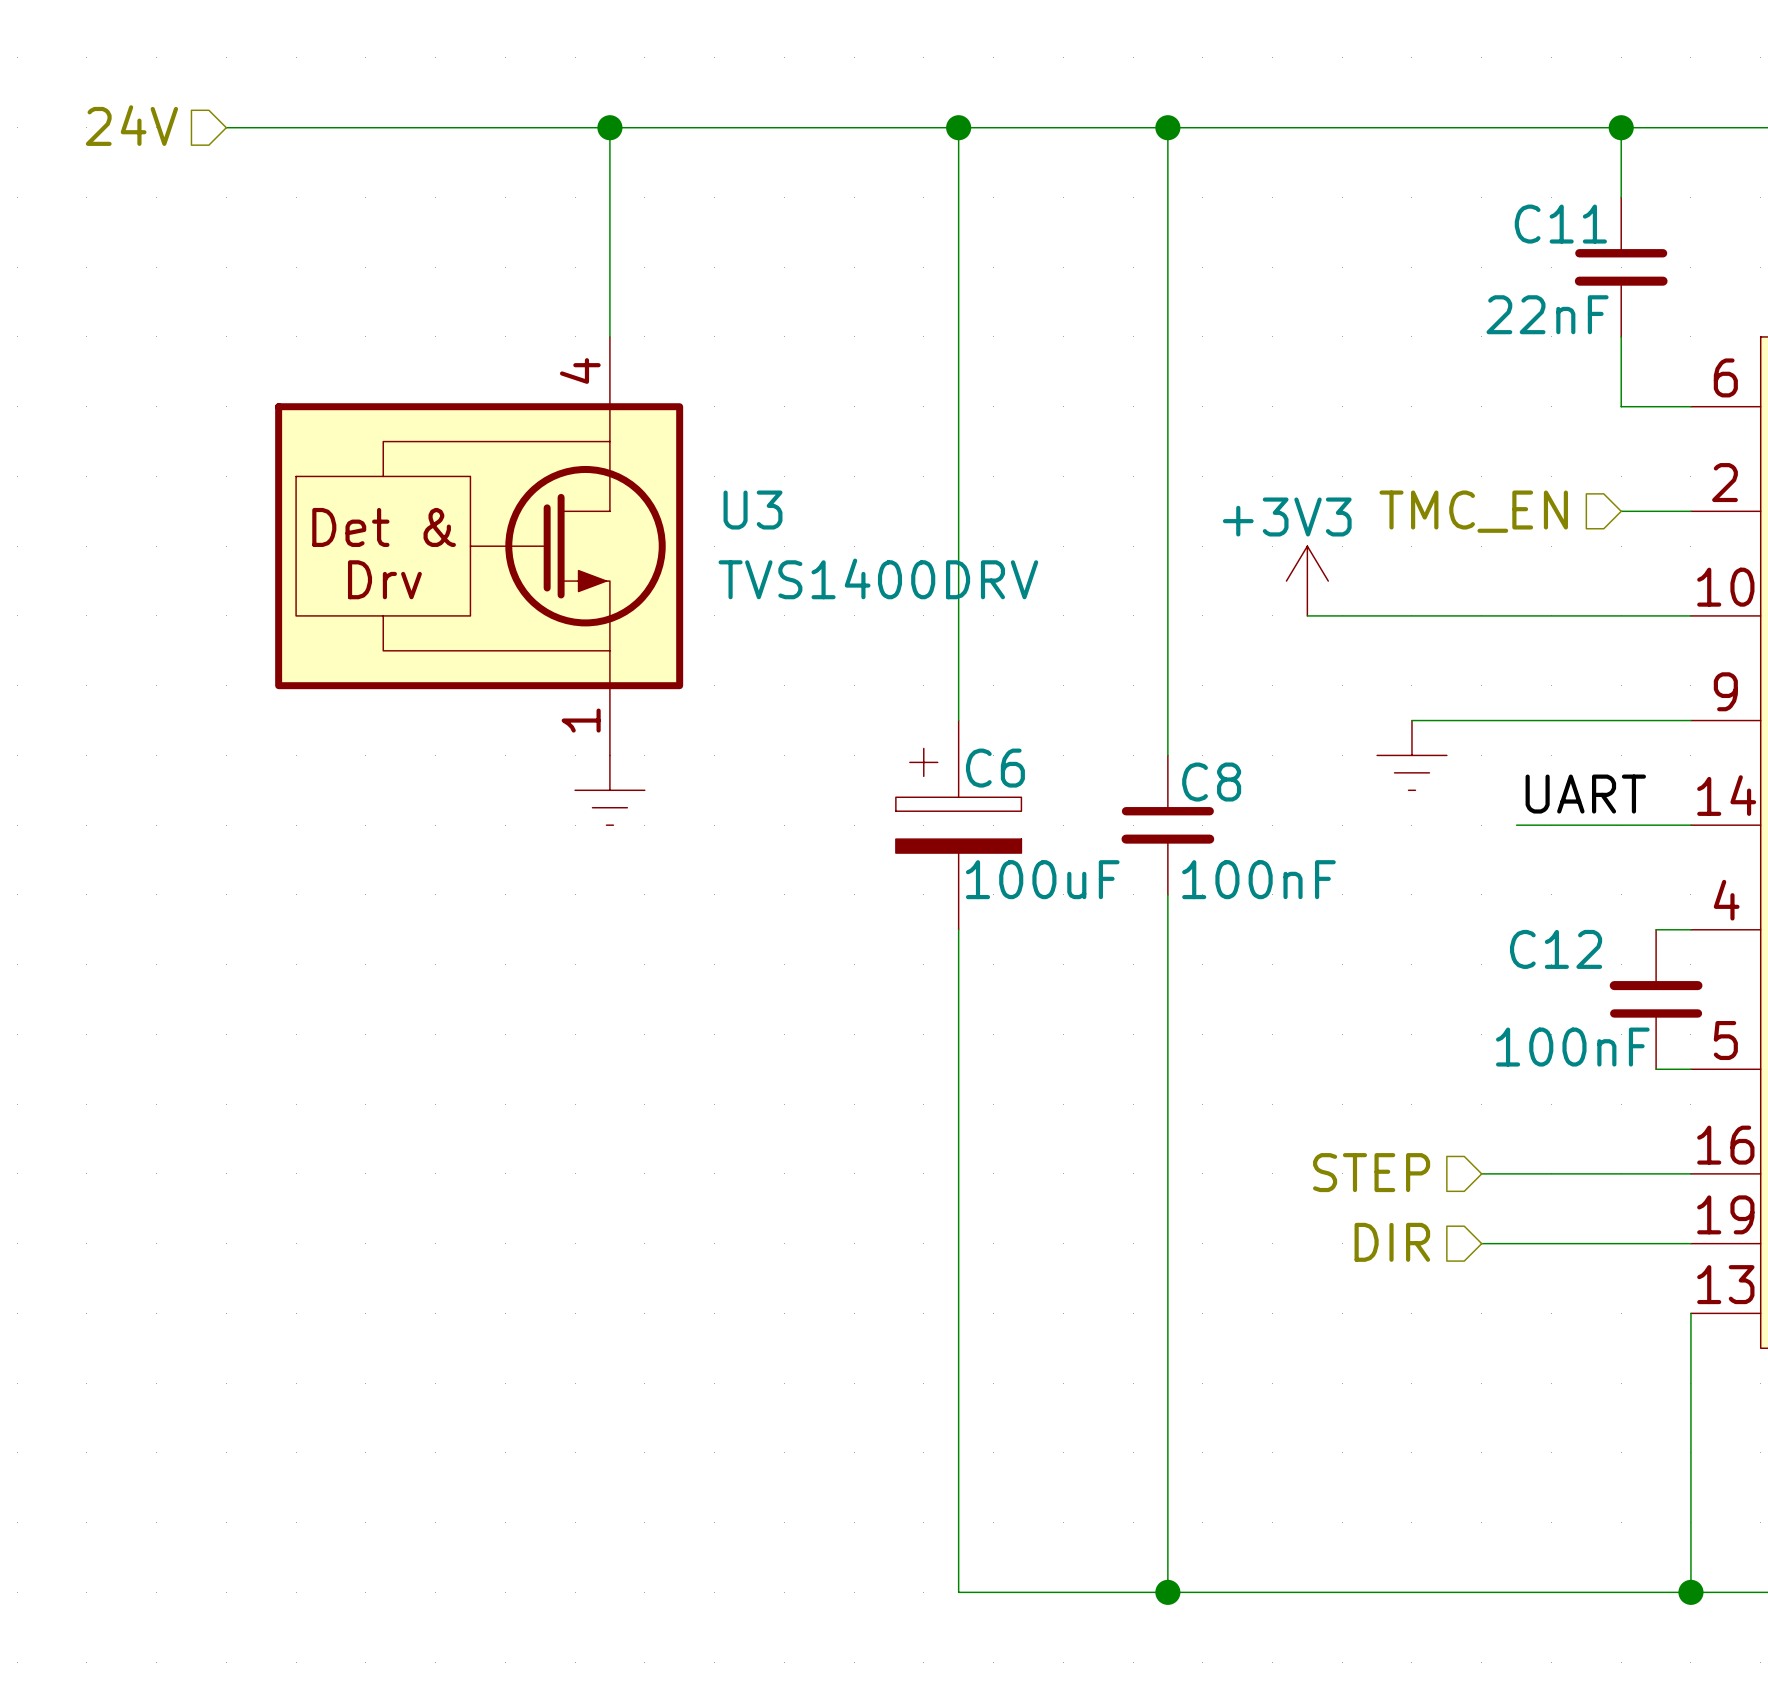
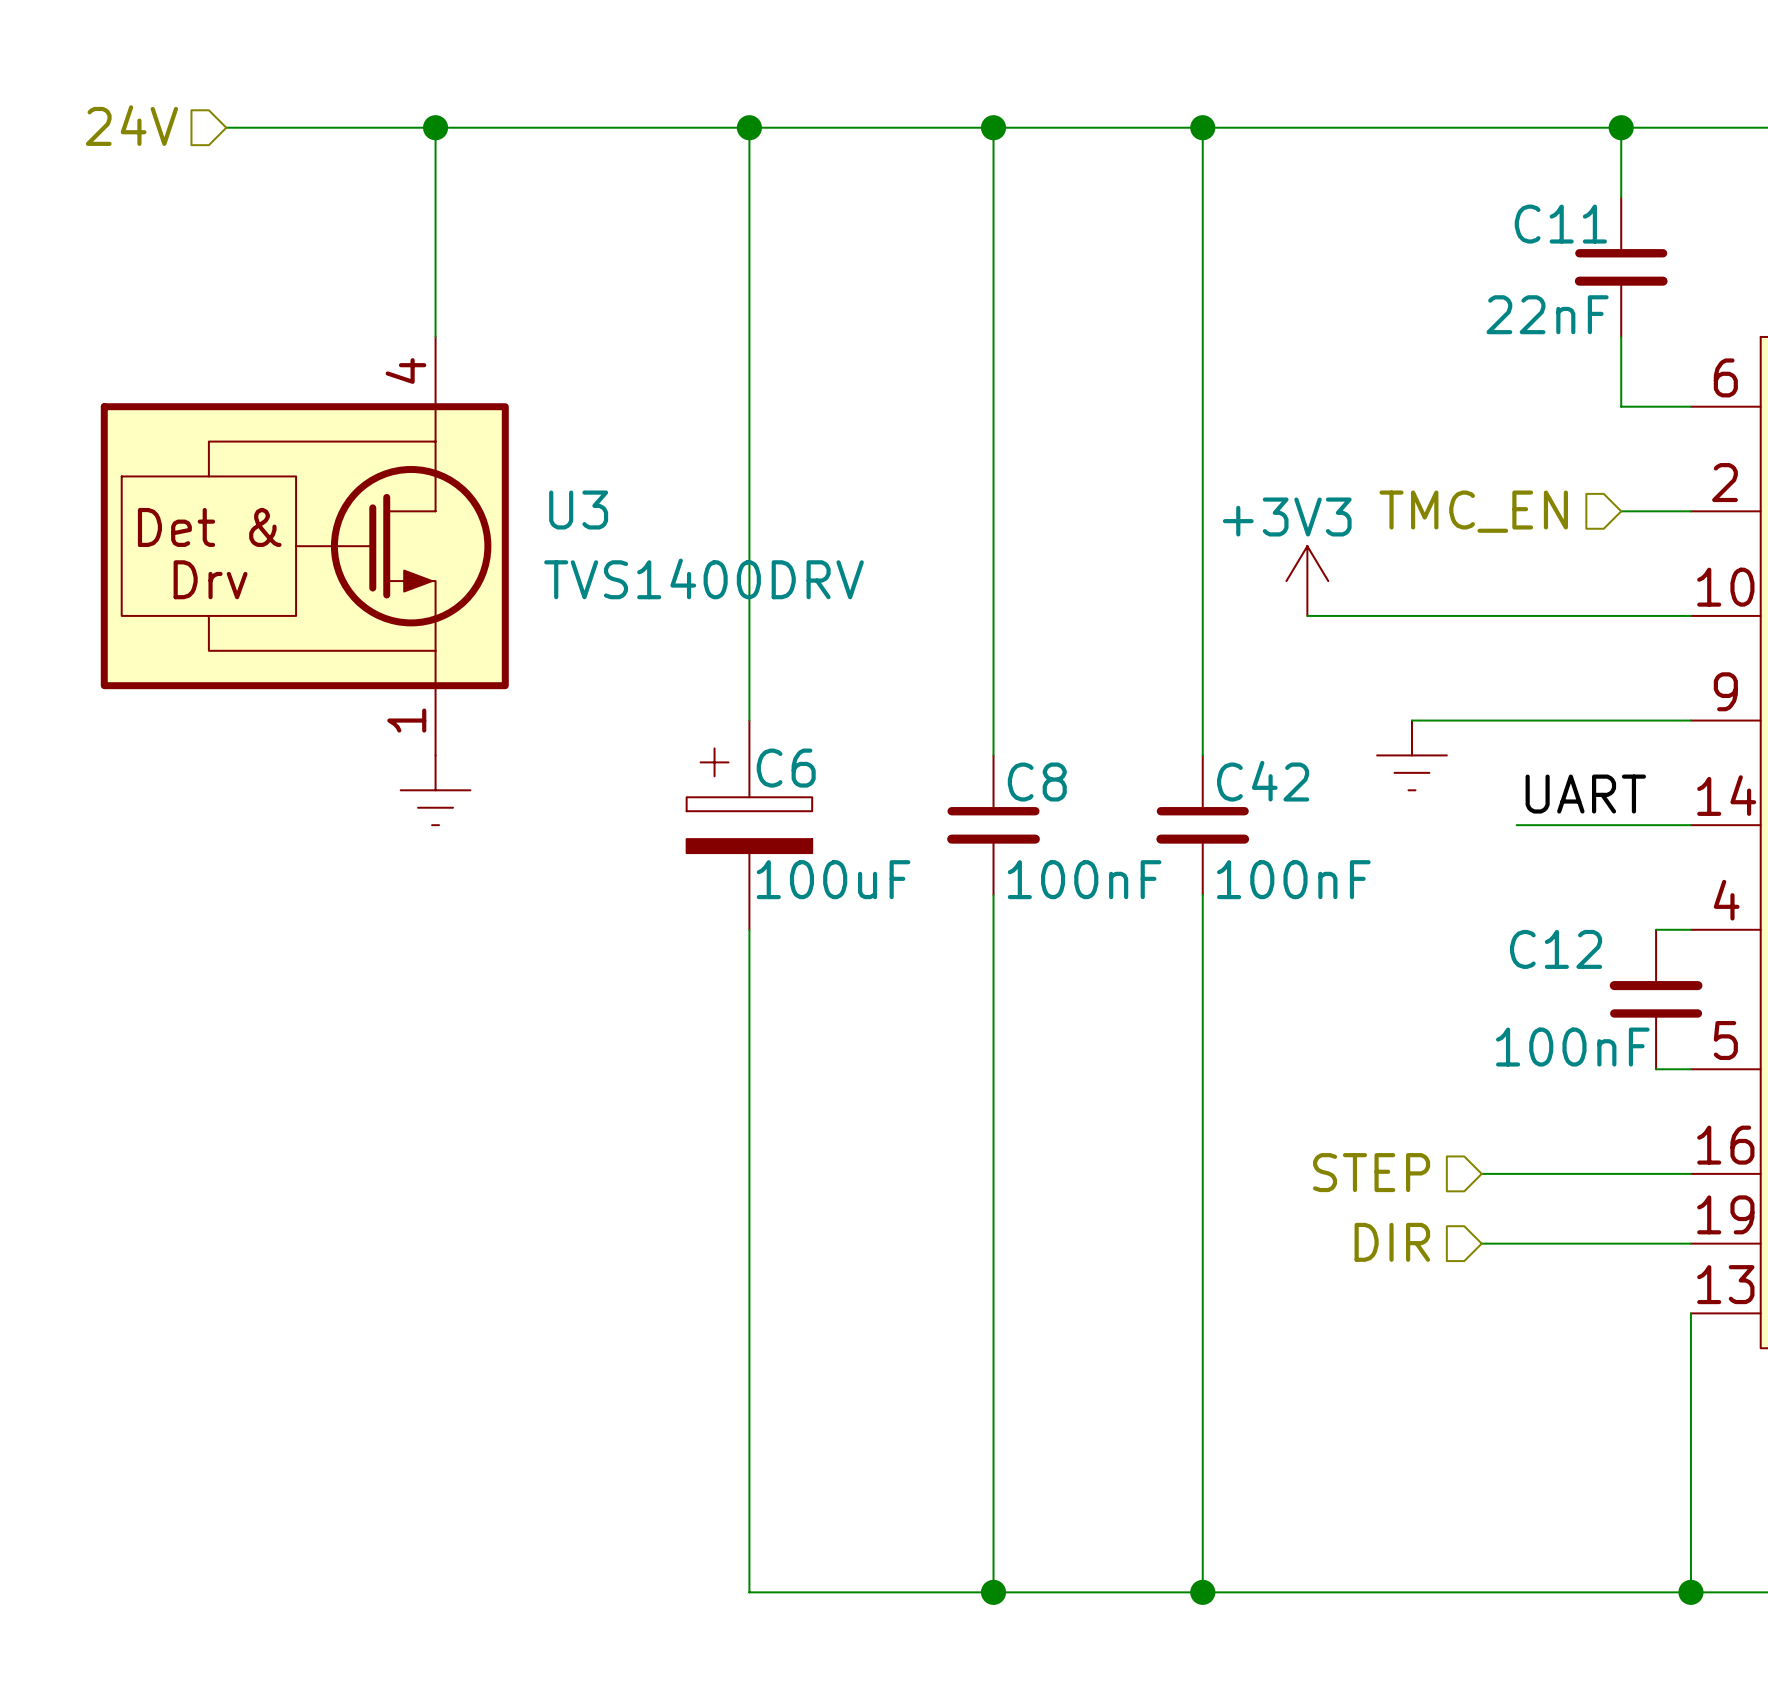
junction: none -> (435, 127)
wire: (609, 127) (609, 336) -> (435, 127) (435, 336)
junction: (609, 127) -> none
junction: none -> (749, 127)
wire: (958, 127) (958, 720) -> (749, 127) (749, 720)
junction position: (958, 127) -> (993, 127)
wire: (1167, 127) (1167, 755) -> (993, 127) (993, 755)
junction position: (1167, 127) -> (1202, 127)
wire: none -> (1202, 127) (1202, 755)
U3 position: (479, 546) -> (304, 546)
power symbol position: (609, 790) -> (435, 790)
C6 position: (958, 825) -> (749, 825)
C8 position: (1167, 825) -> (993, 825)
C42: none -> 100nF (1202, 825)
wire: (1167, 894) (1167, 1592) -> (993, 894) (993, 1592)
wire: none -> (1202, 894) (1202, 1592)
wire: (958, 929) (958, 1592) -> (749, 929) (749, 1592) (958, 1592)
junction: none -> (993, 1592)
junction position: (1167, 1592) -> (1202, 1592)

